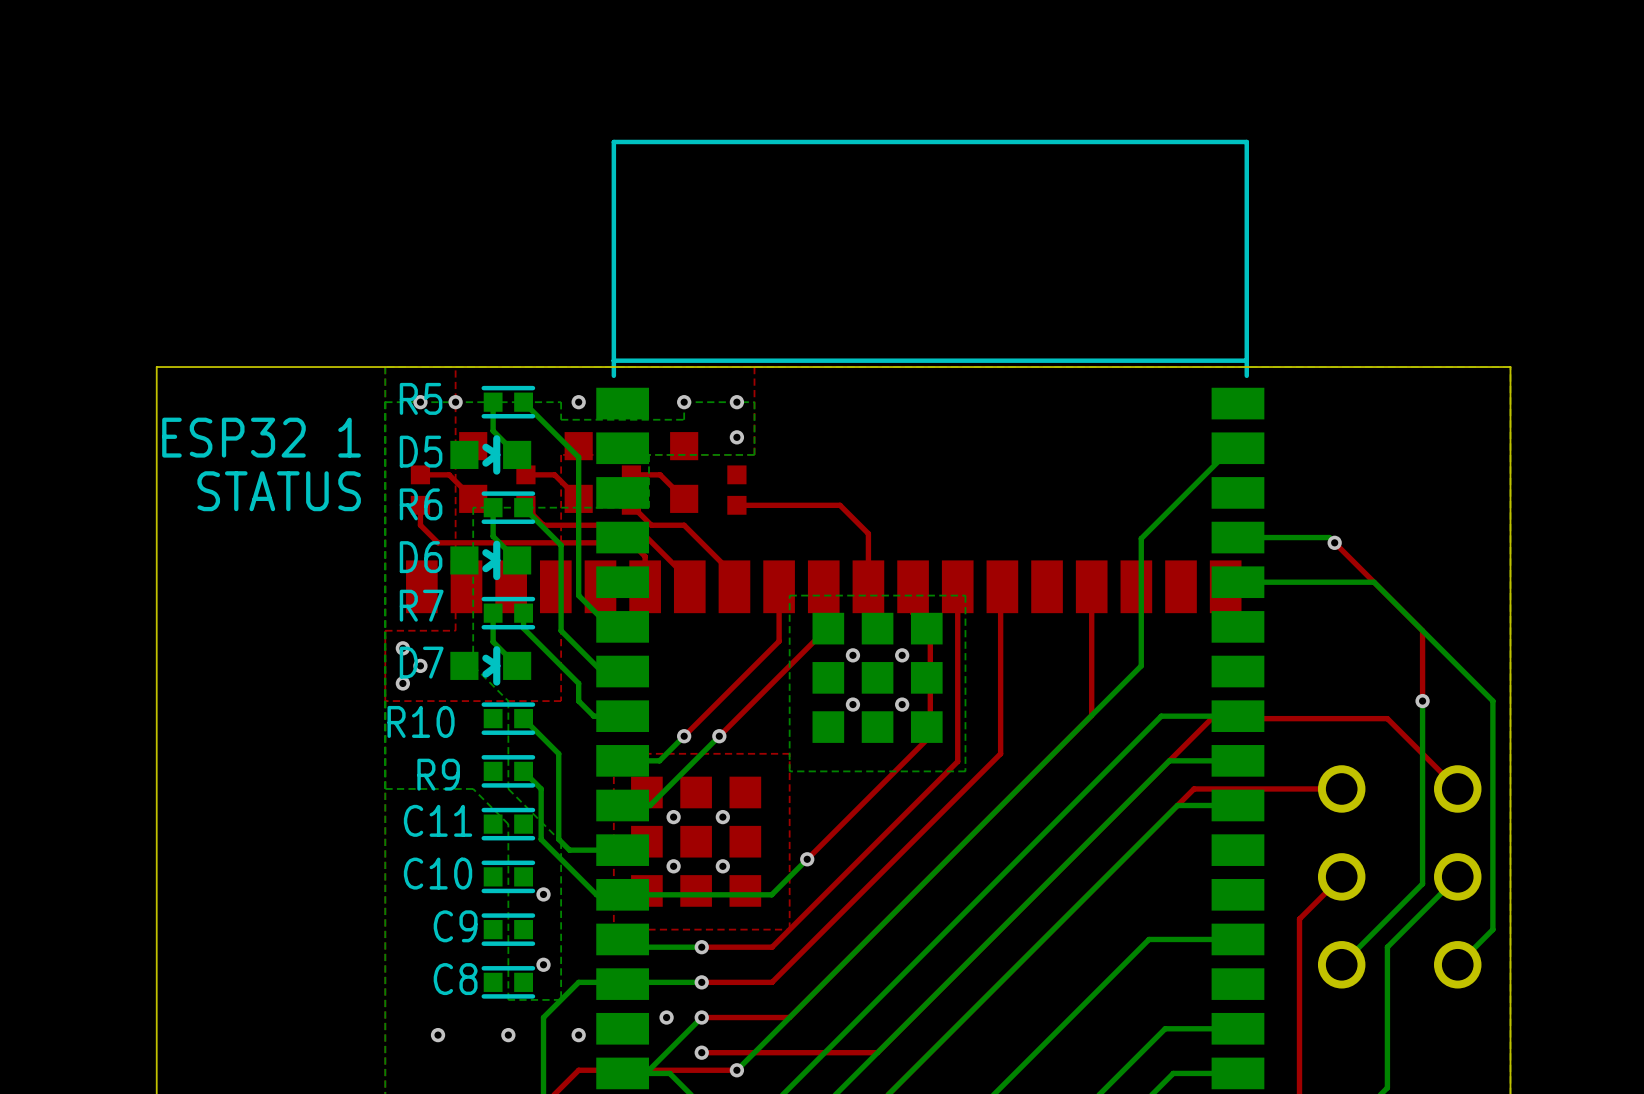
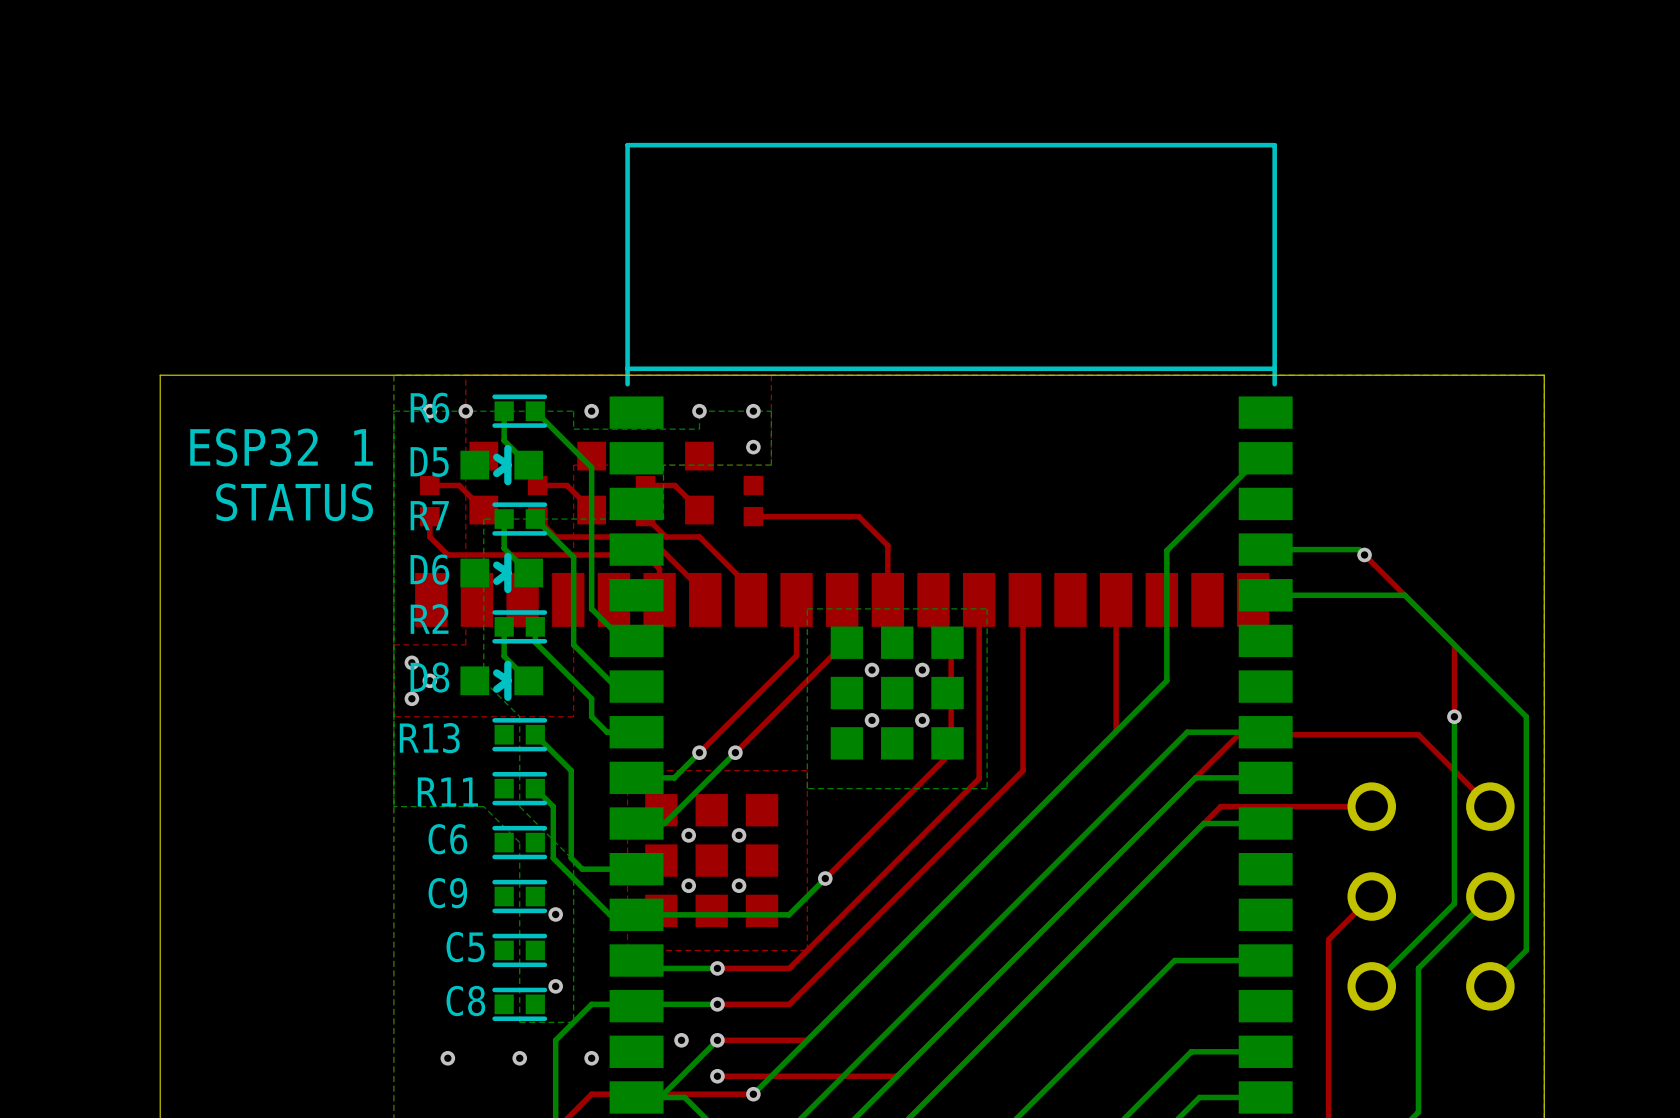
R5 name: R5 (421, 398) -> R6 (429, 407)
R6 name: R6 (421, 504) -> R7 (429, 515)
R7 name: R7 (421, 605) -> R2 (429, 618)
D7 name: D7 (421, 662) -> D8 (429, 677)
R10 name: R10 (421, 721) -> R13 (429, 738)
R9 name: R9 (438, 774) -> R11 (447, 792)
C11 name: C11 (438, 820) -> C6 (447, 839)
C10 name: C10 (438, 873) -> C9 (447, 893)
C9 name: C9 (455, 926) -> C5 (465, 947)

